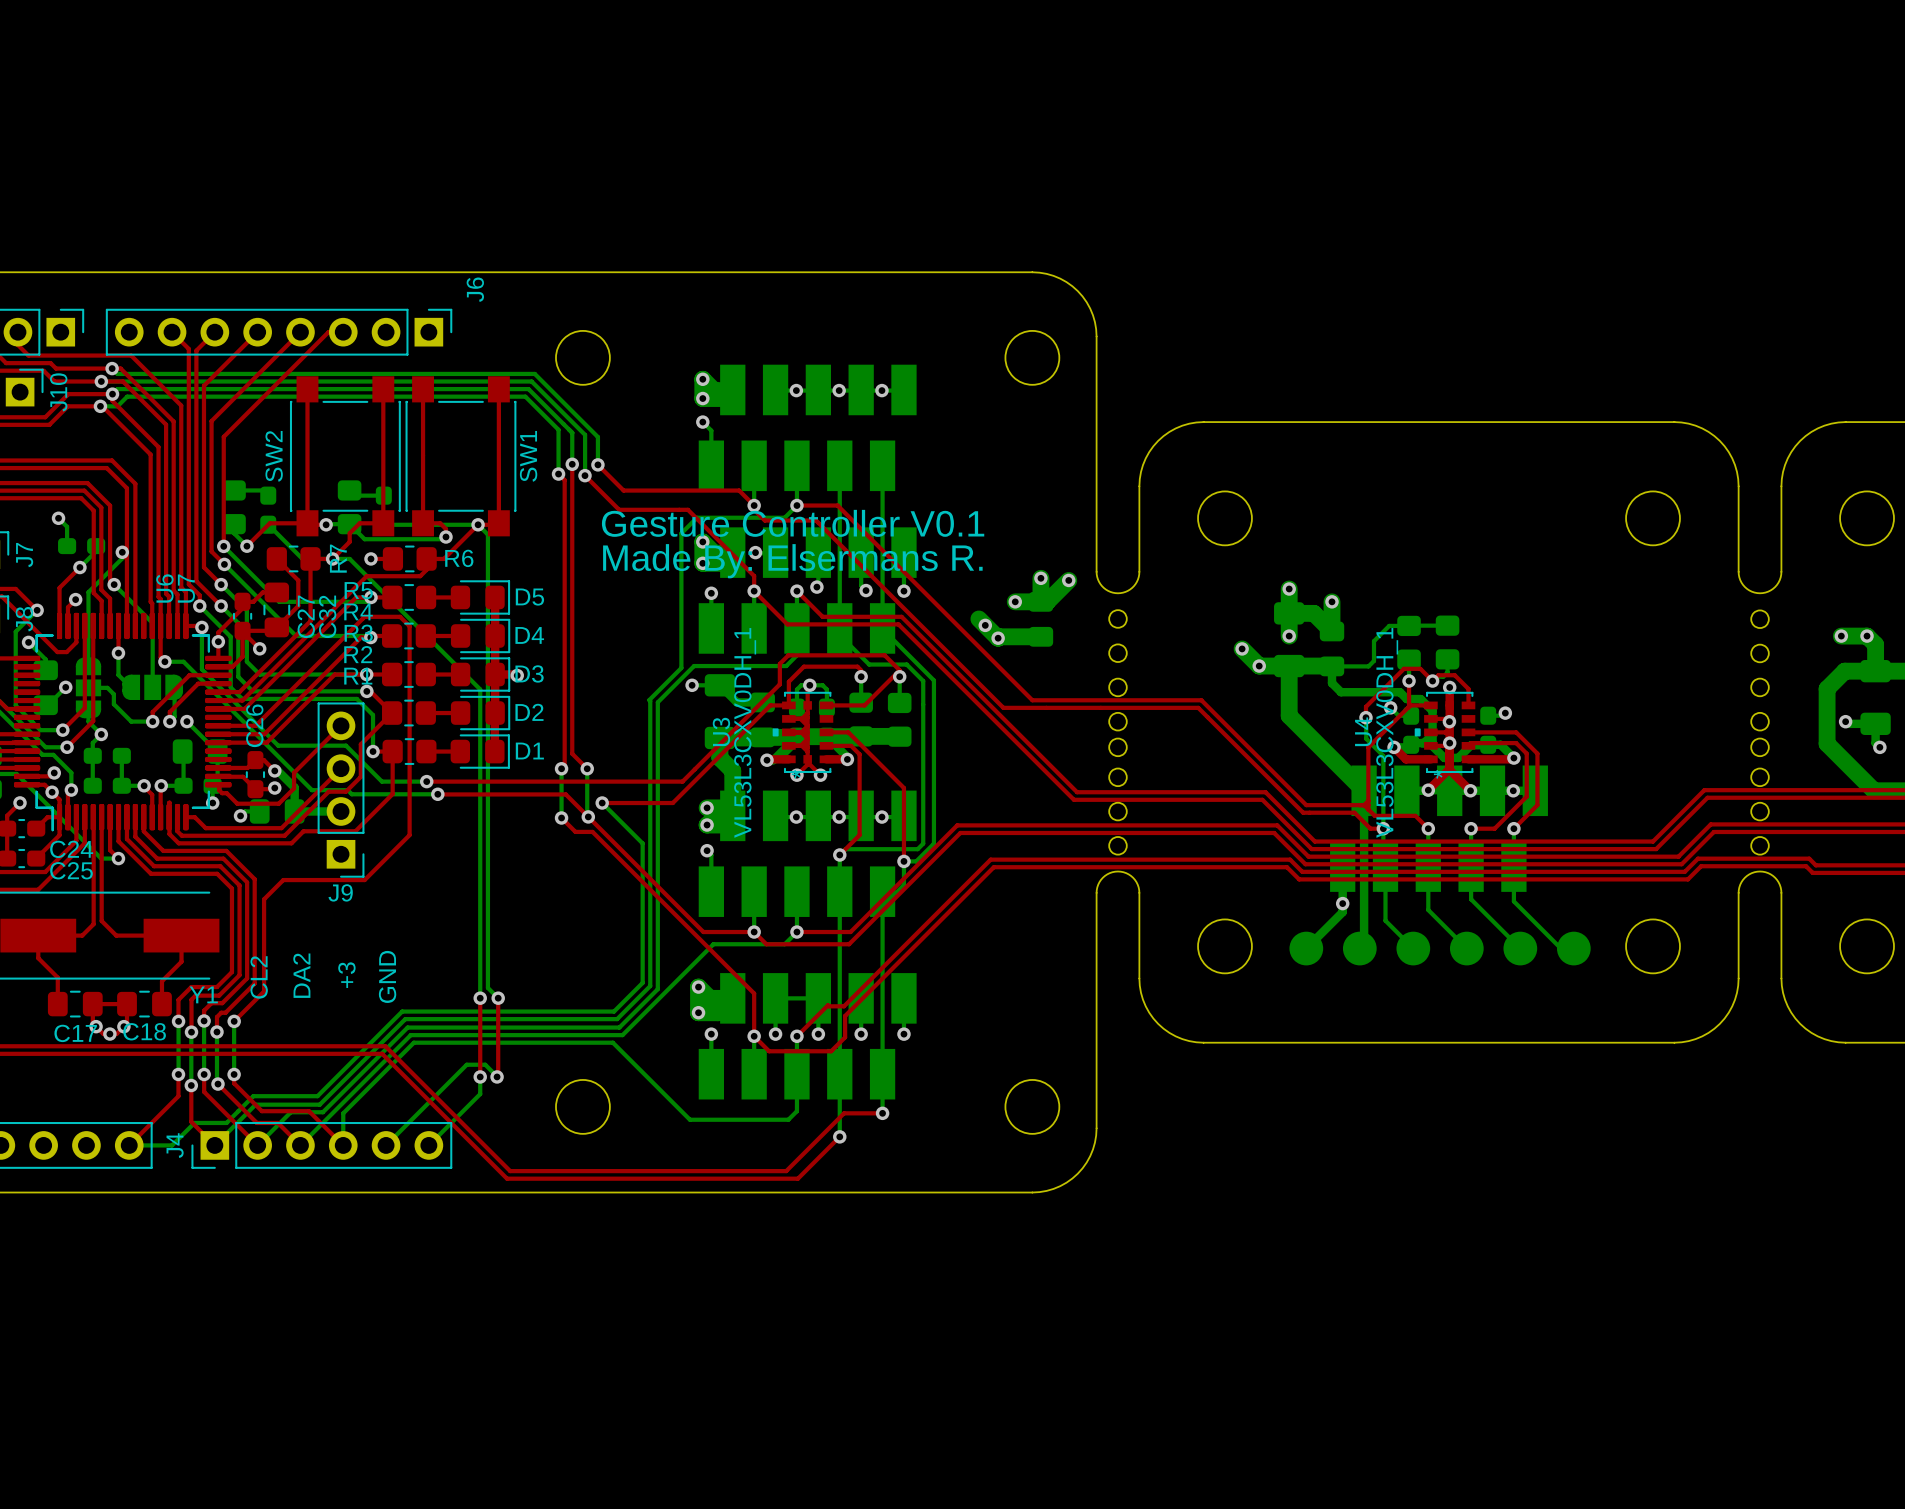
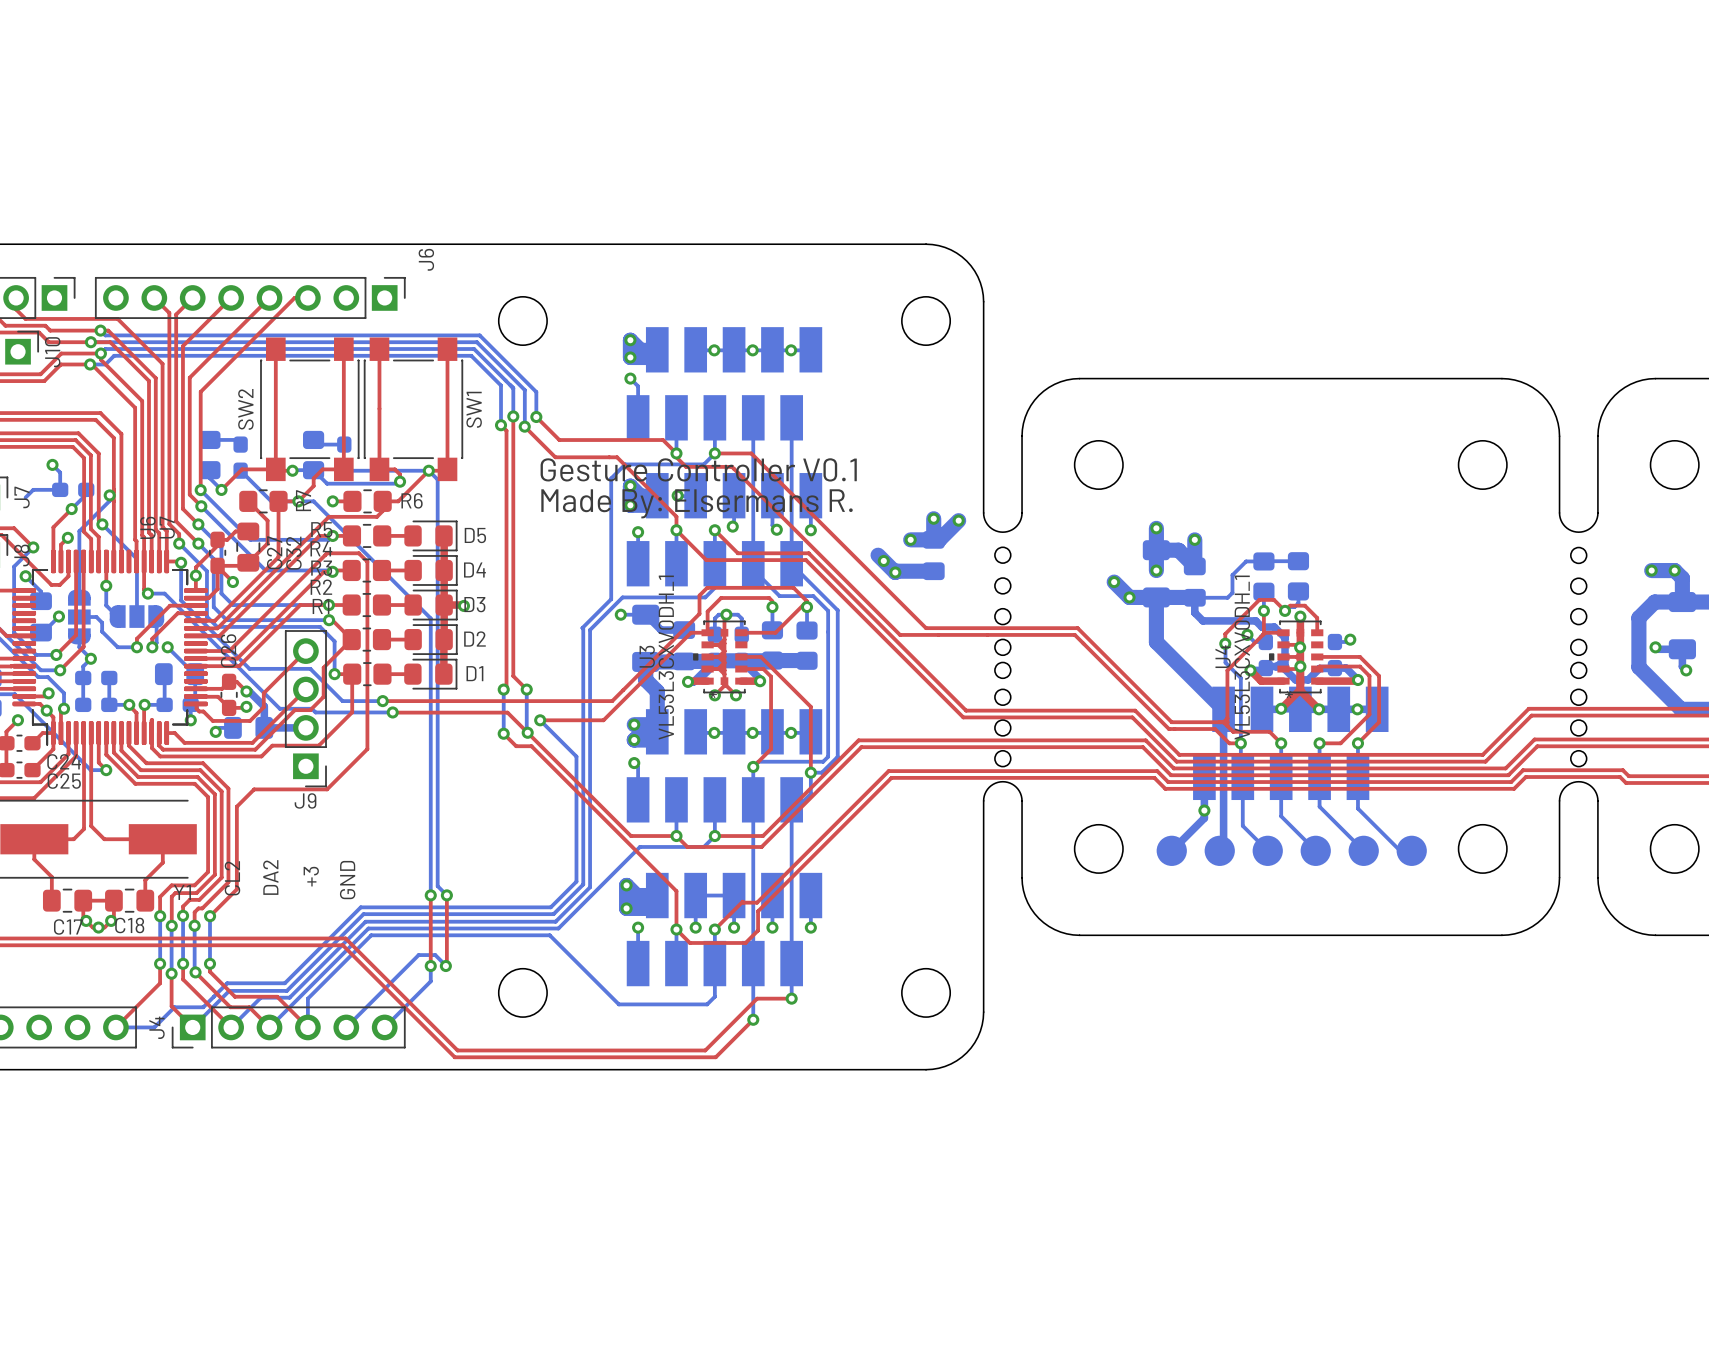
bottom track: none -> (60, 489) (33, 489) (25, 497)

